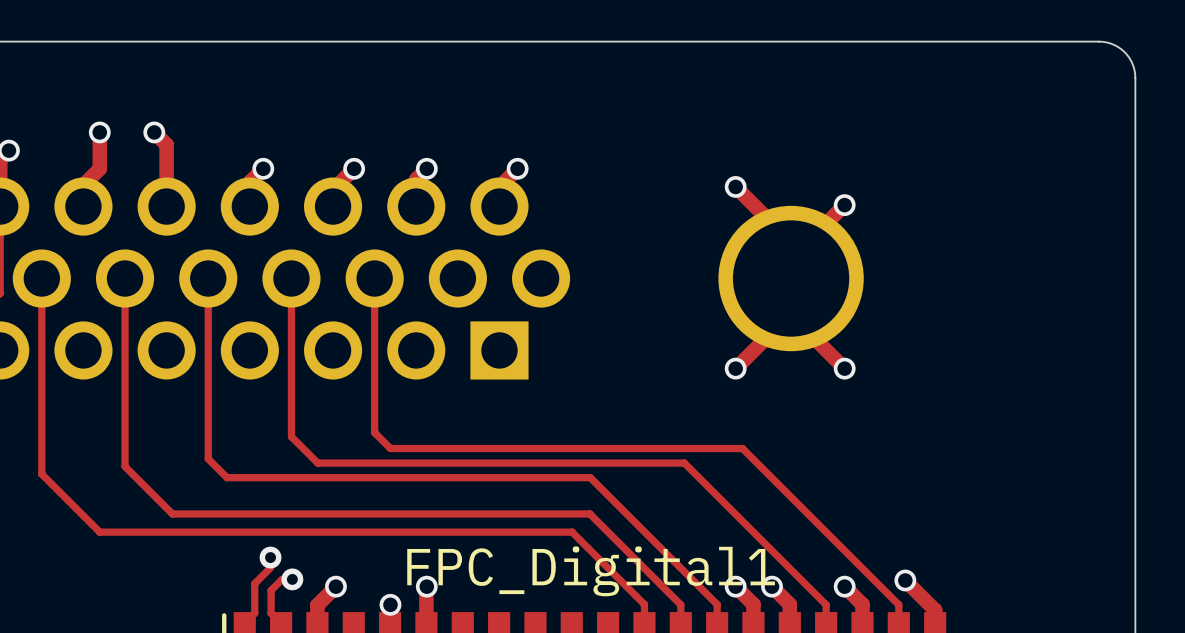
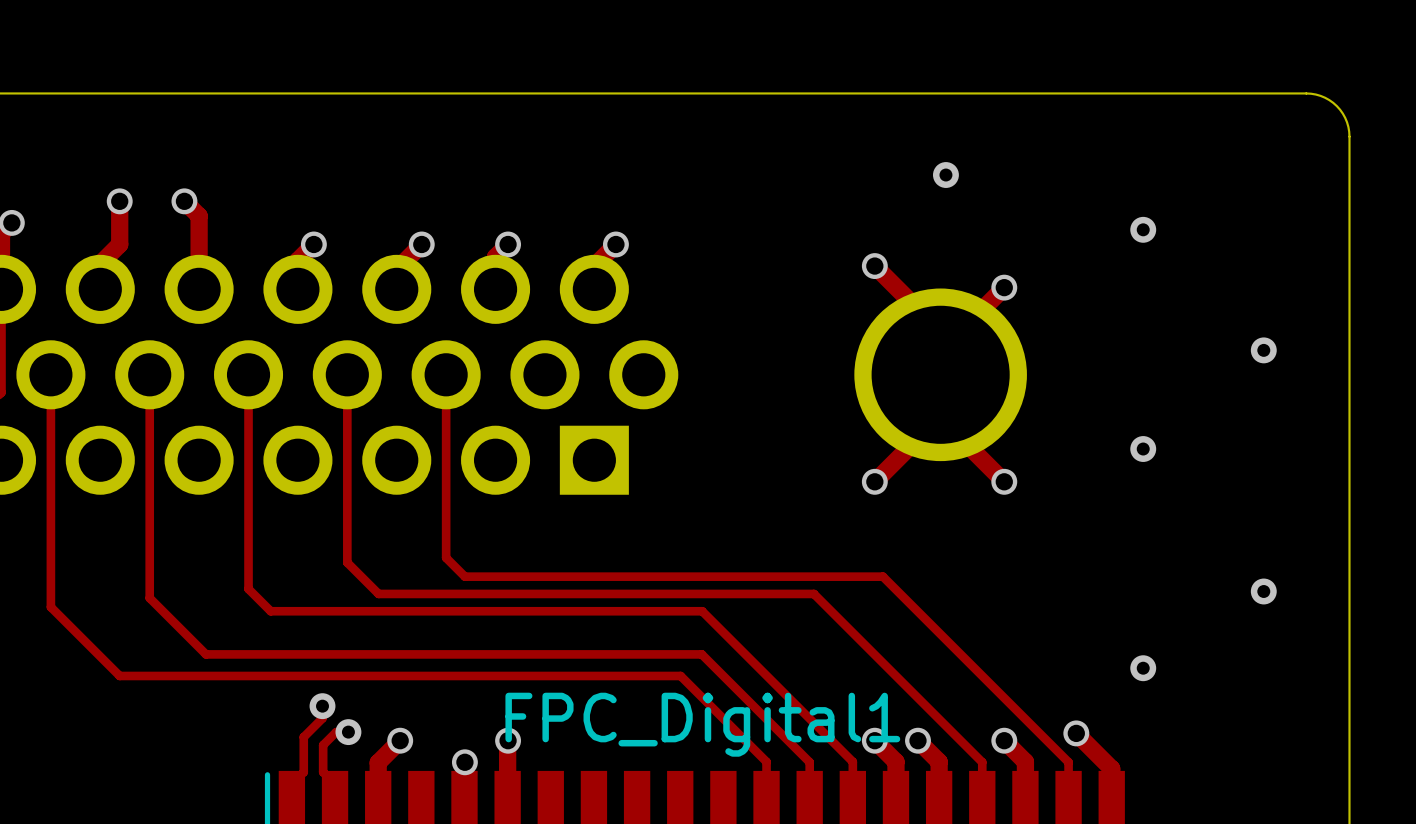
via: none -> (945, 175)
via: none -> (1143, 229)
via: none -> (1263, 350)
via: none -> (1143, 449)
via: none -> (1263, 591)
via: none -> (1143, 668)

